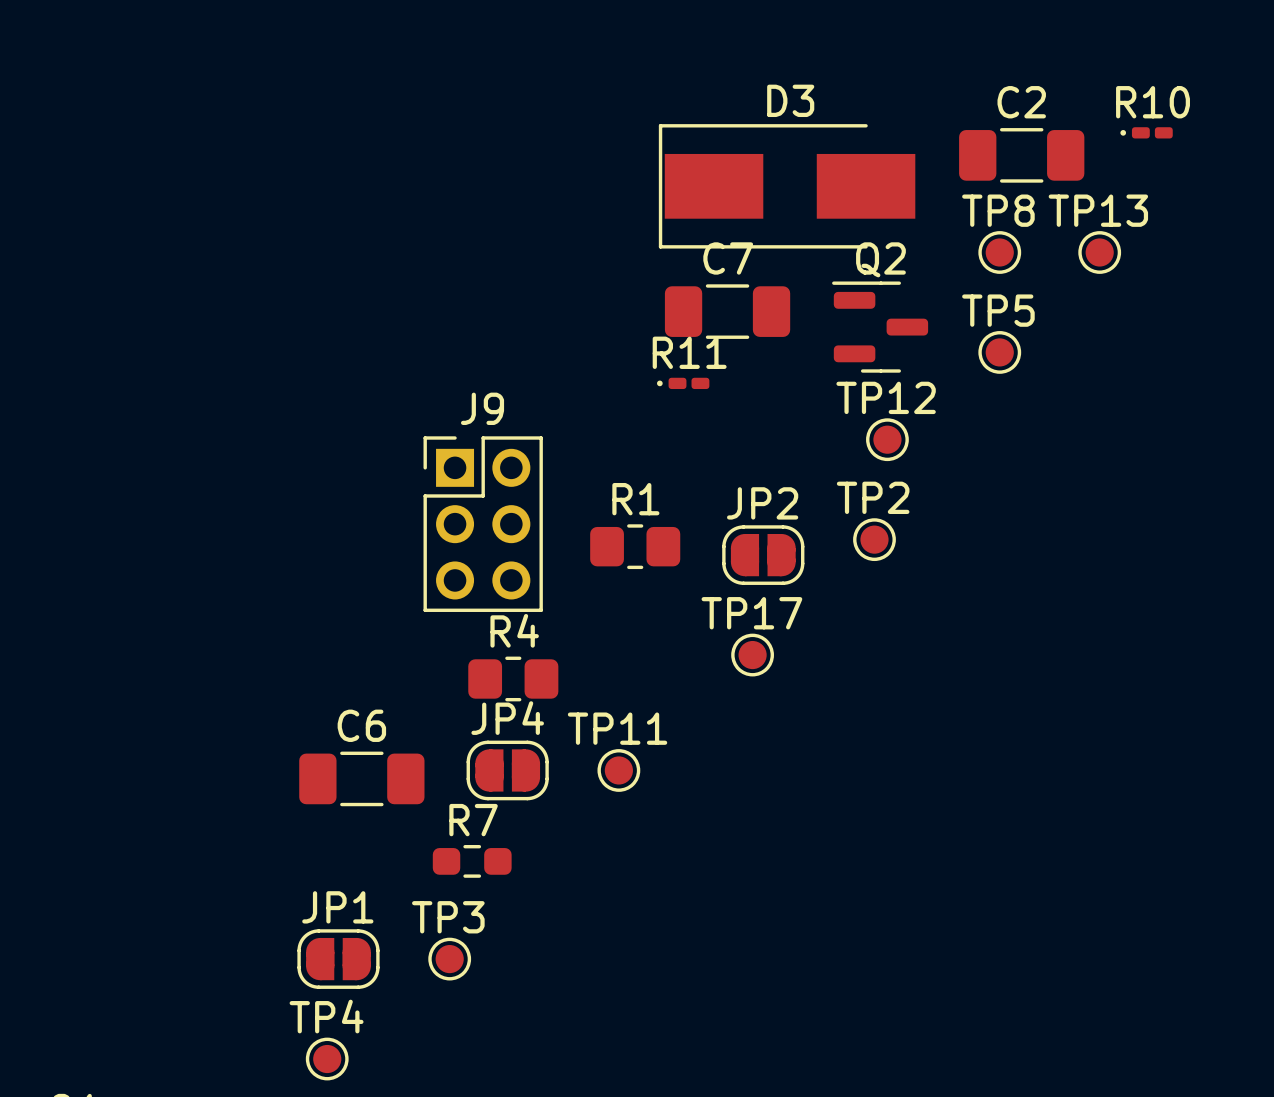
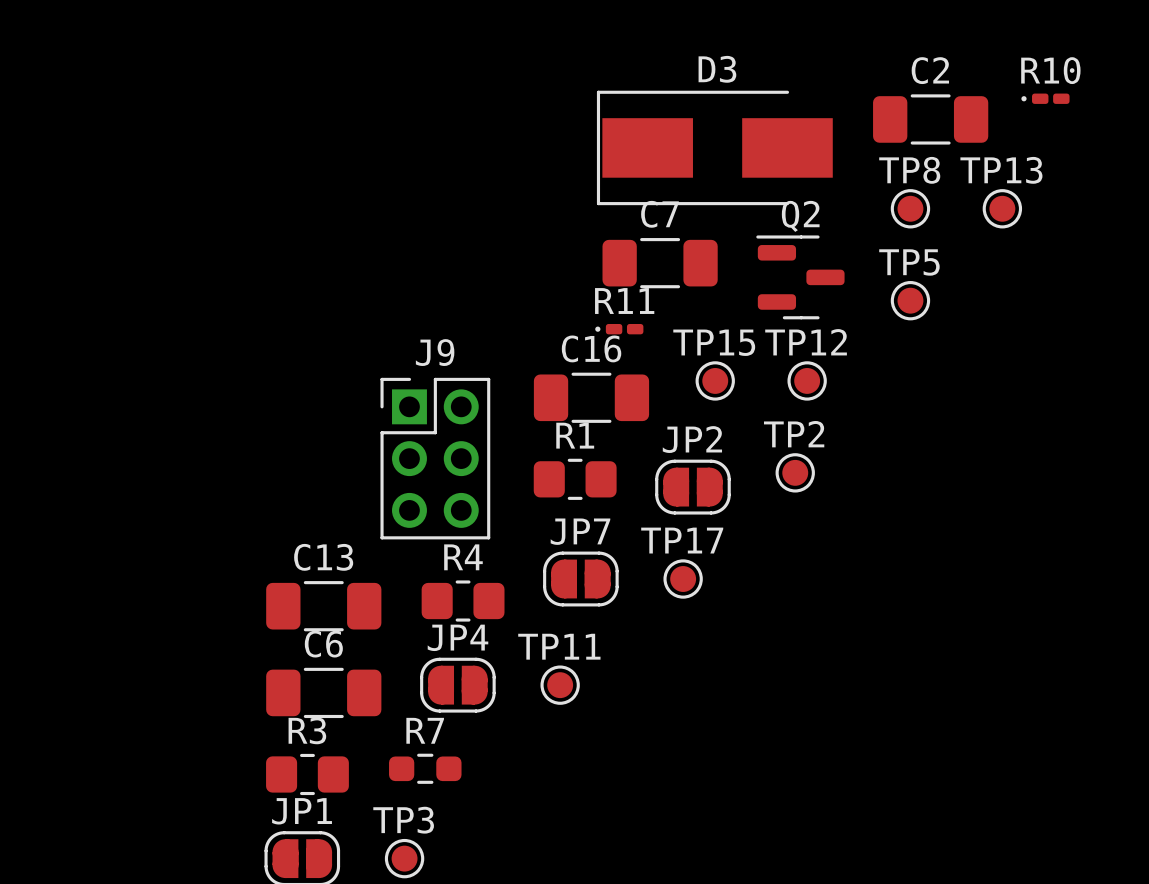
TP15: none -> (715, 380)
C16: none -> (591, 397)
JP7: none -> (580, 579)
C13: none -> (323, 606)
R3: none -> (307, 774)

